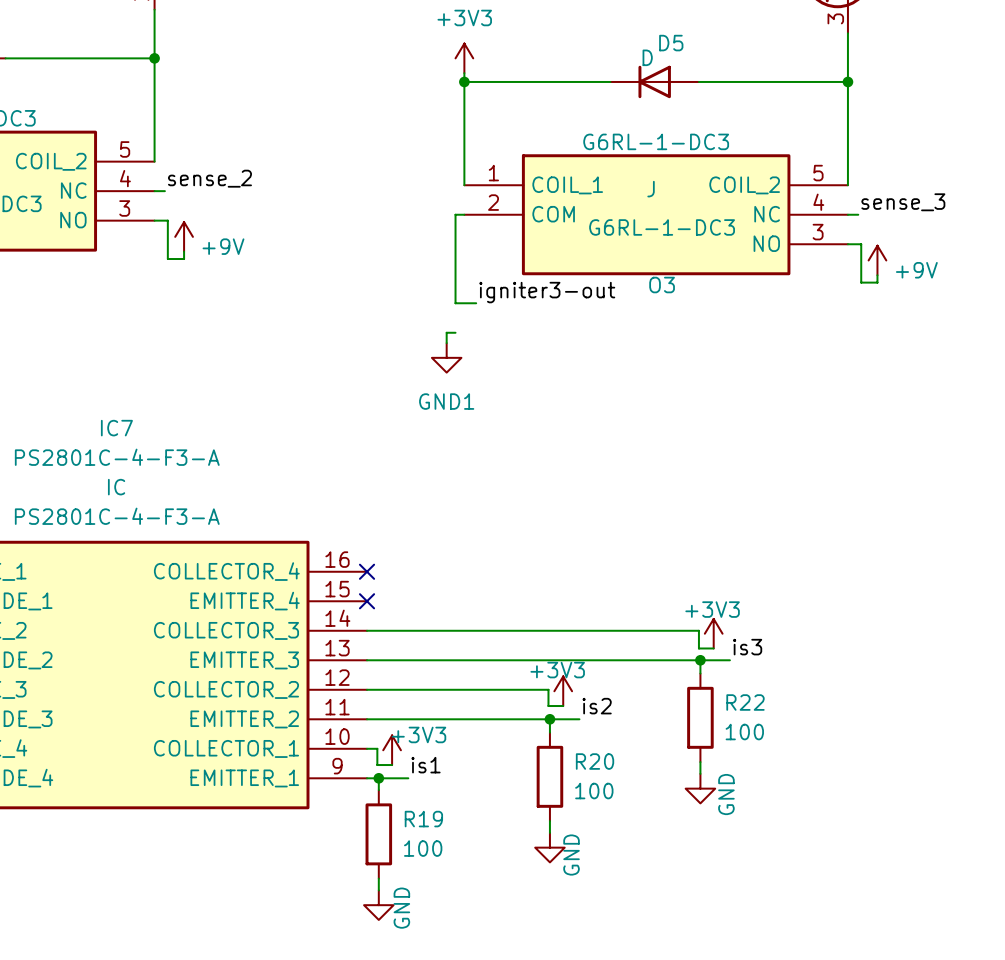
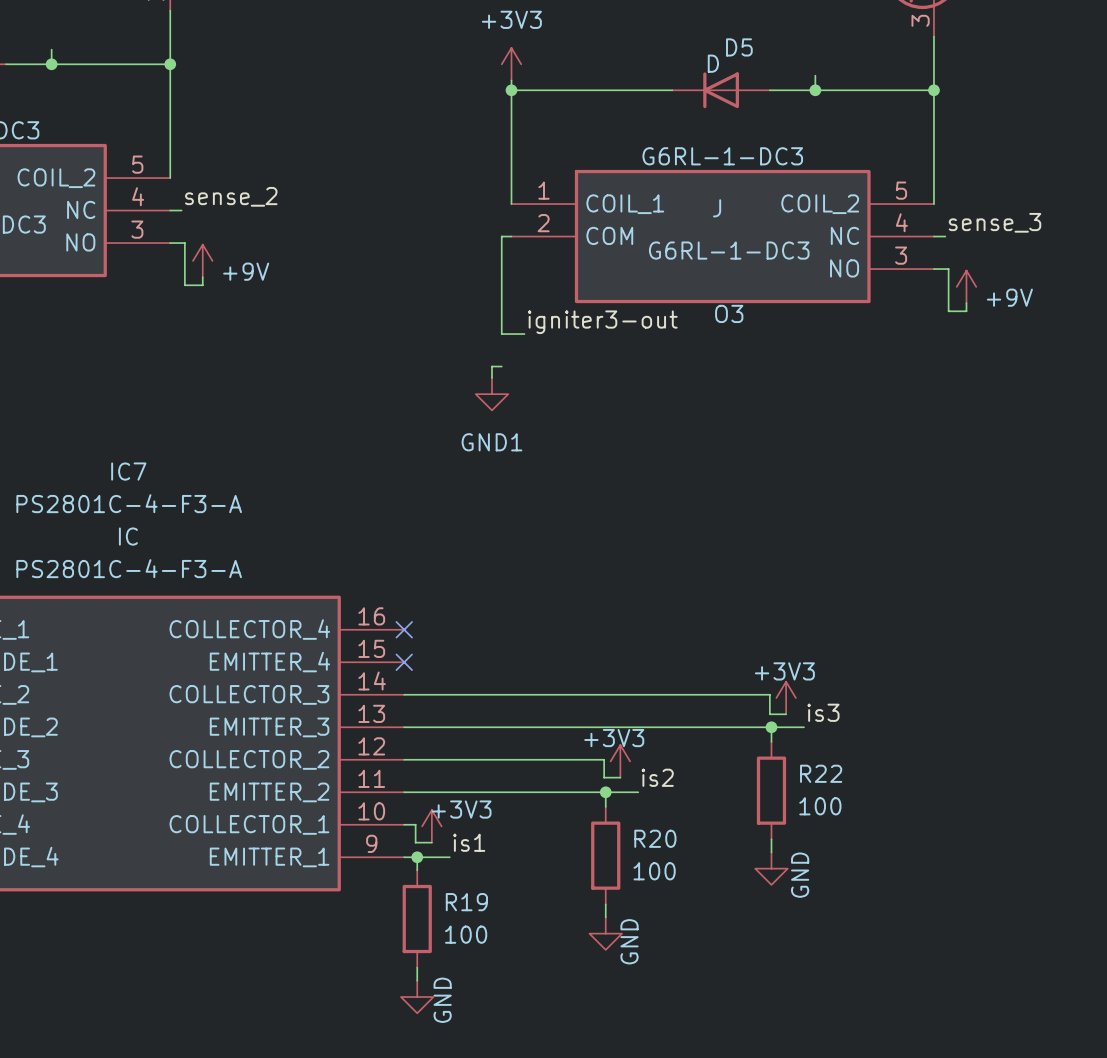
wire: none -> (51, 49) (51, 64)
junction: none -> (51, 64)
wire: none -> (815, 75) (815, 90)
junction: none -> (815, 90)

